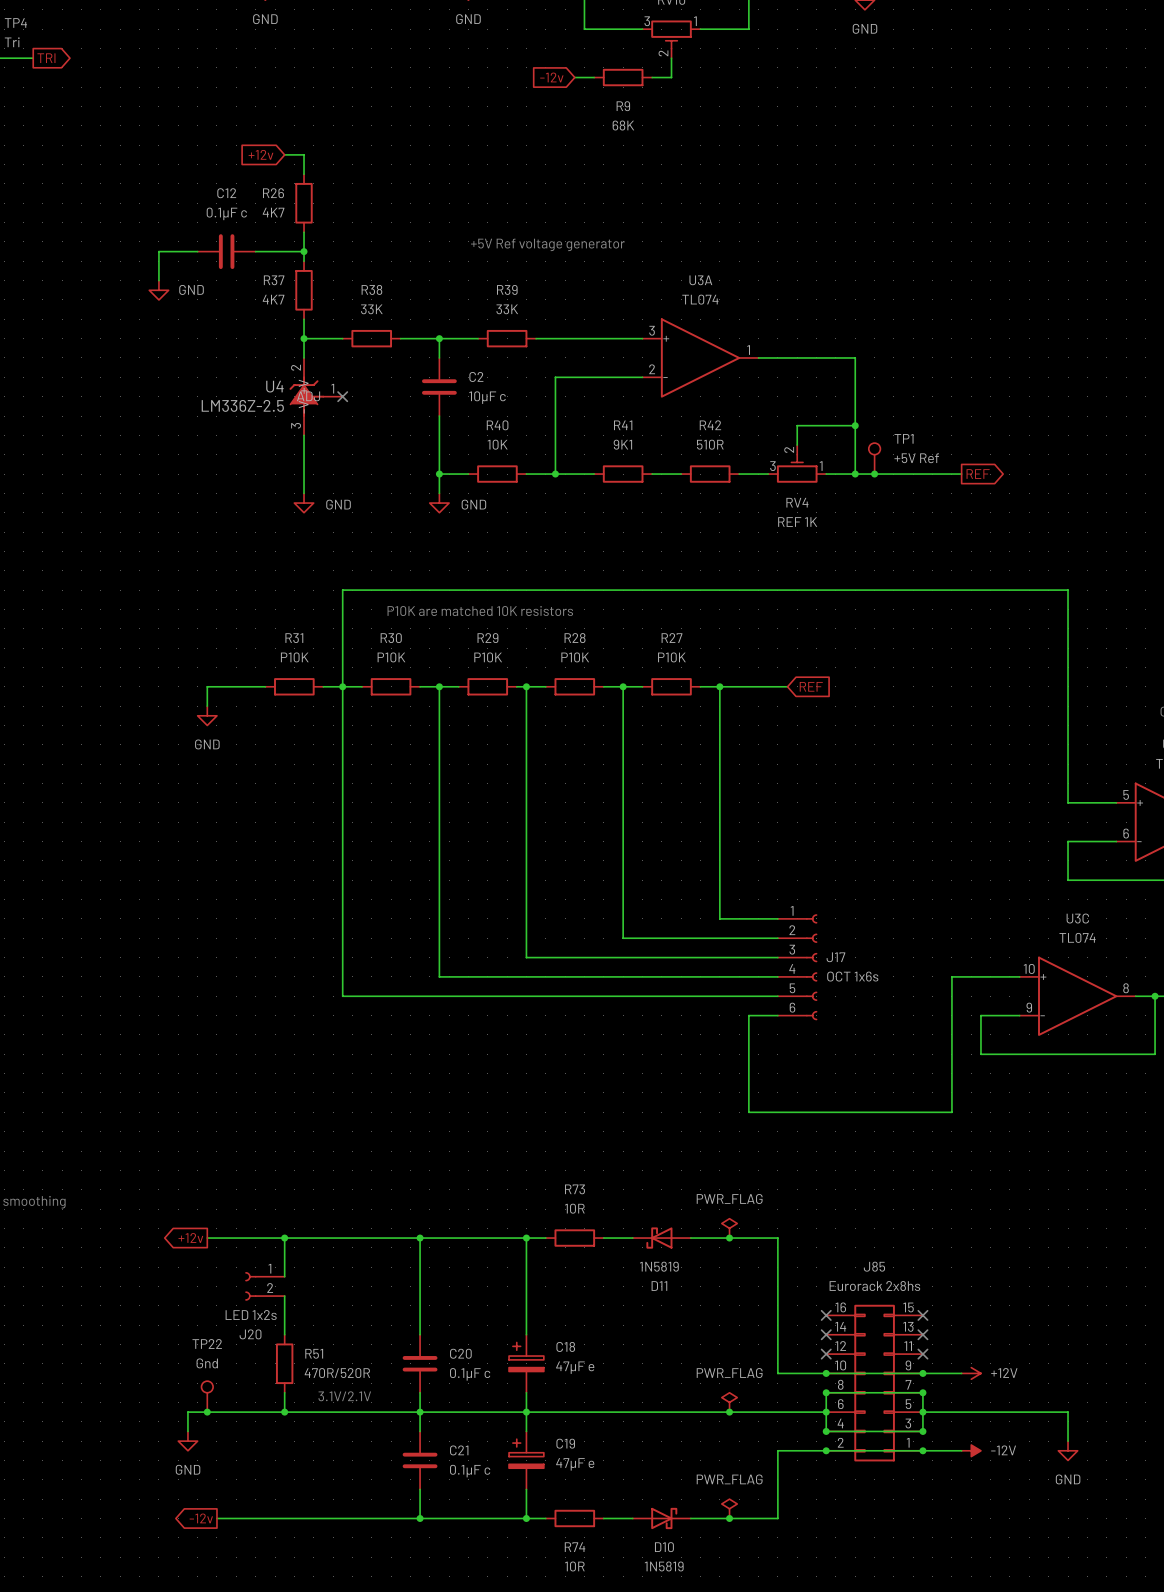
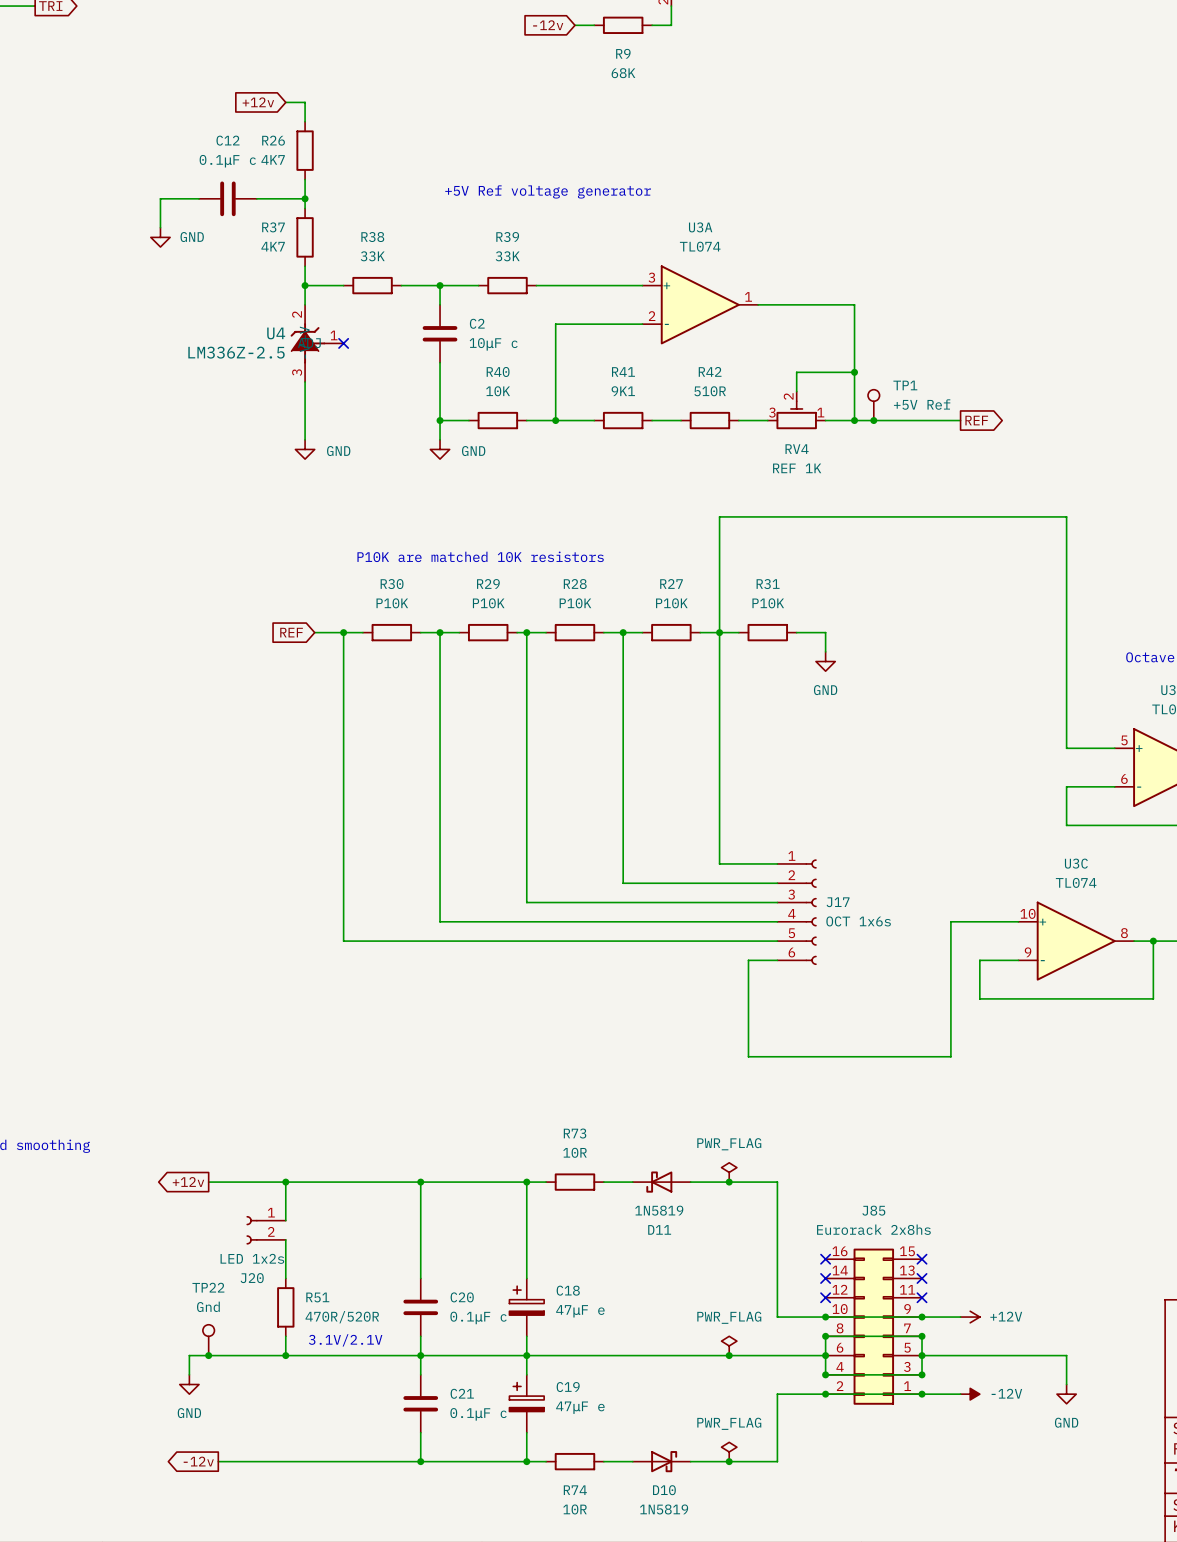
wire: (1068, 590) (342, 590) (342, 686) -> (1066, 536) (1066, 516) (719, 516) (719, 632)
wire: (265, 686) (207, 686) (207, 706) -> none
global label: none -> REF (291, 632)
R31 position: (294, 686) -> (767, 632)
wire: (739, 686) (787, 686) -> none
wire: none -> (796, 632) (825, 632) (825, 651)
global label: REF (811, 686) -> none
power symbol: GND (207, 715) -> none
power symbol: none -> GND (825, 661)

